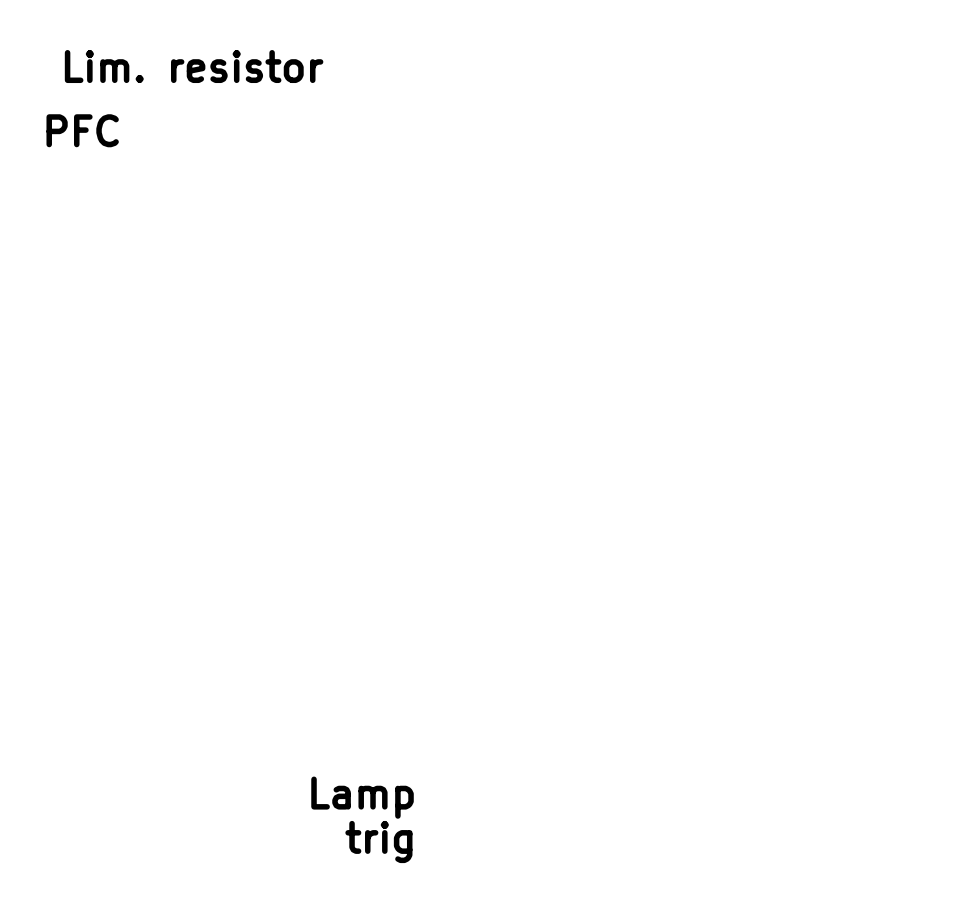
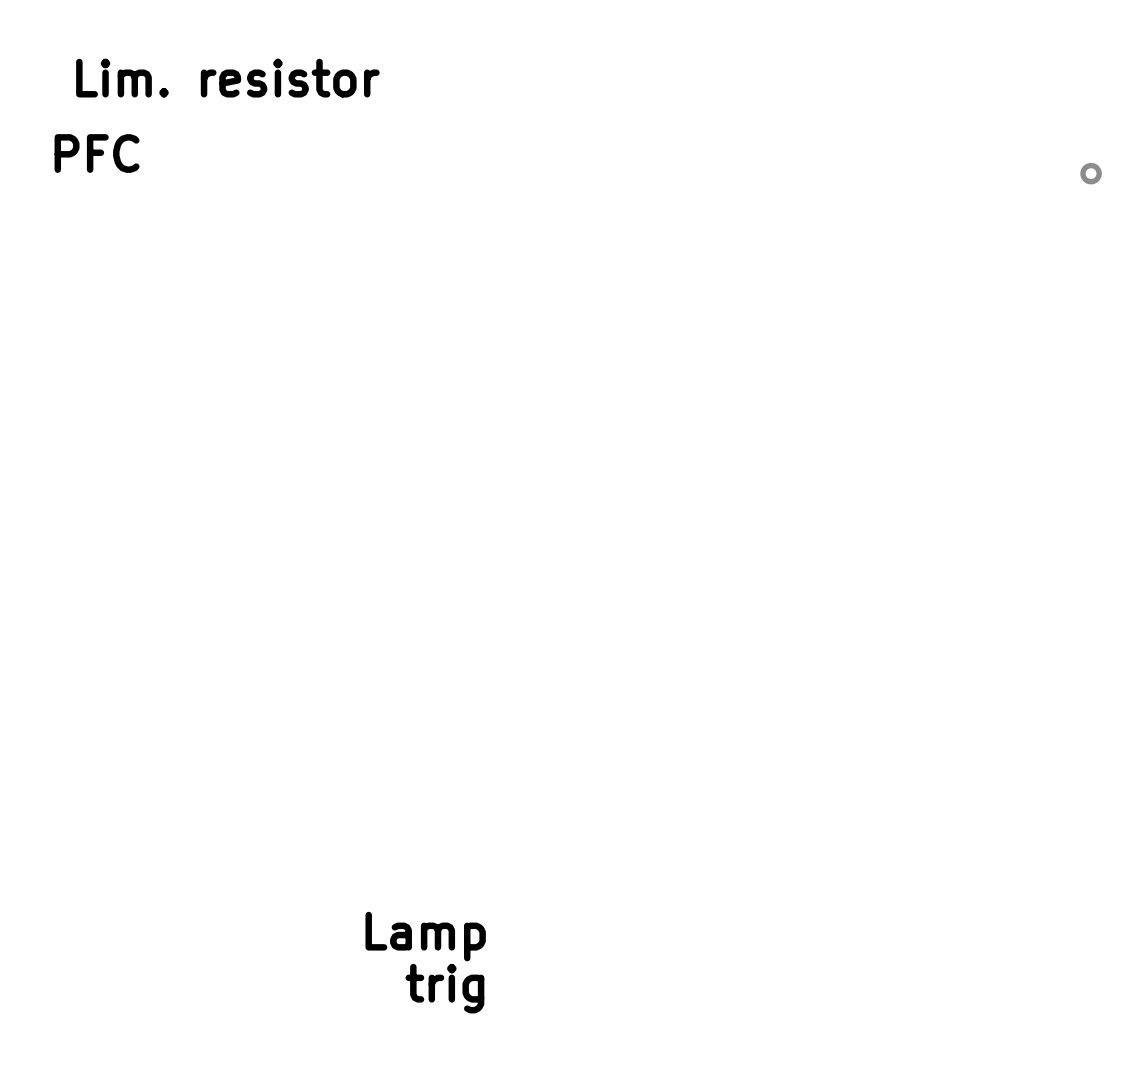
part: none -> (1091, 173)

